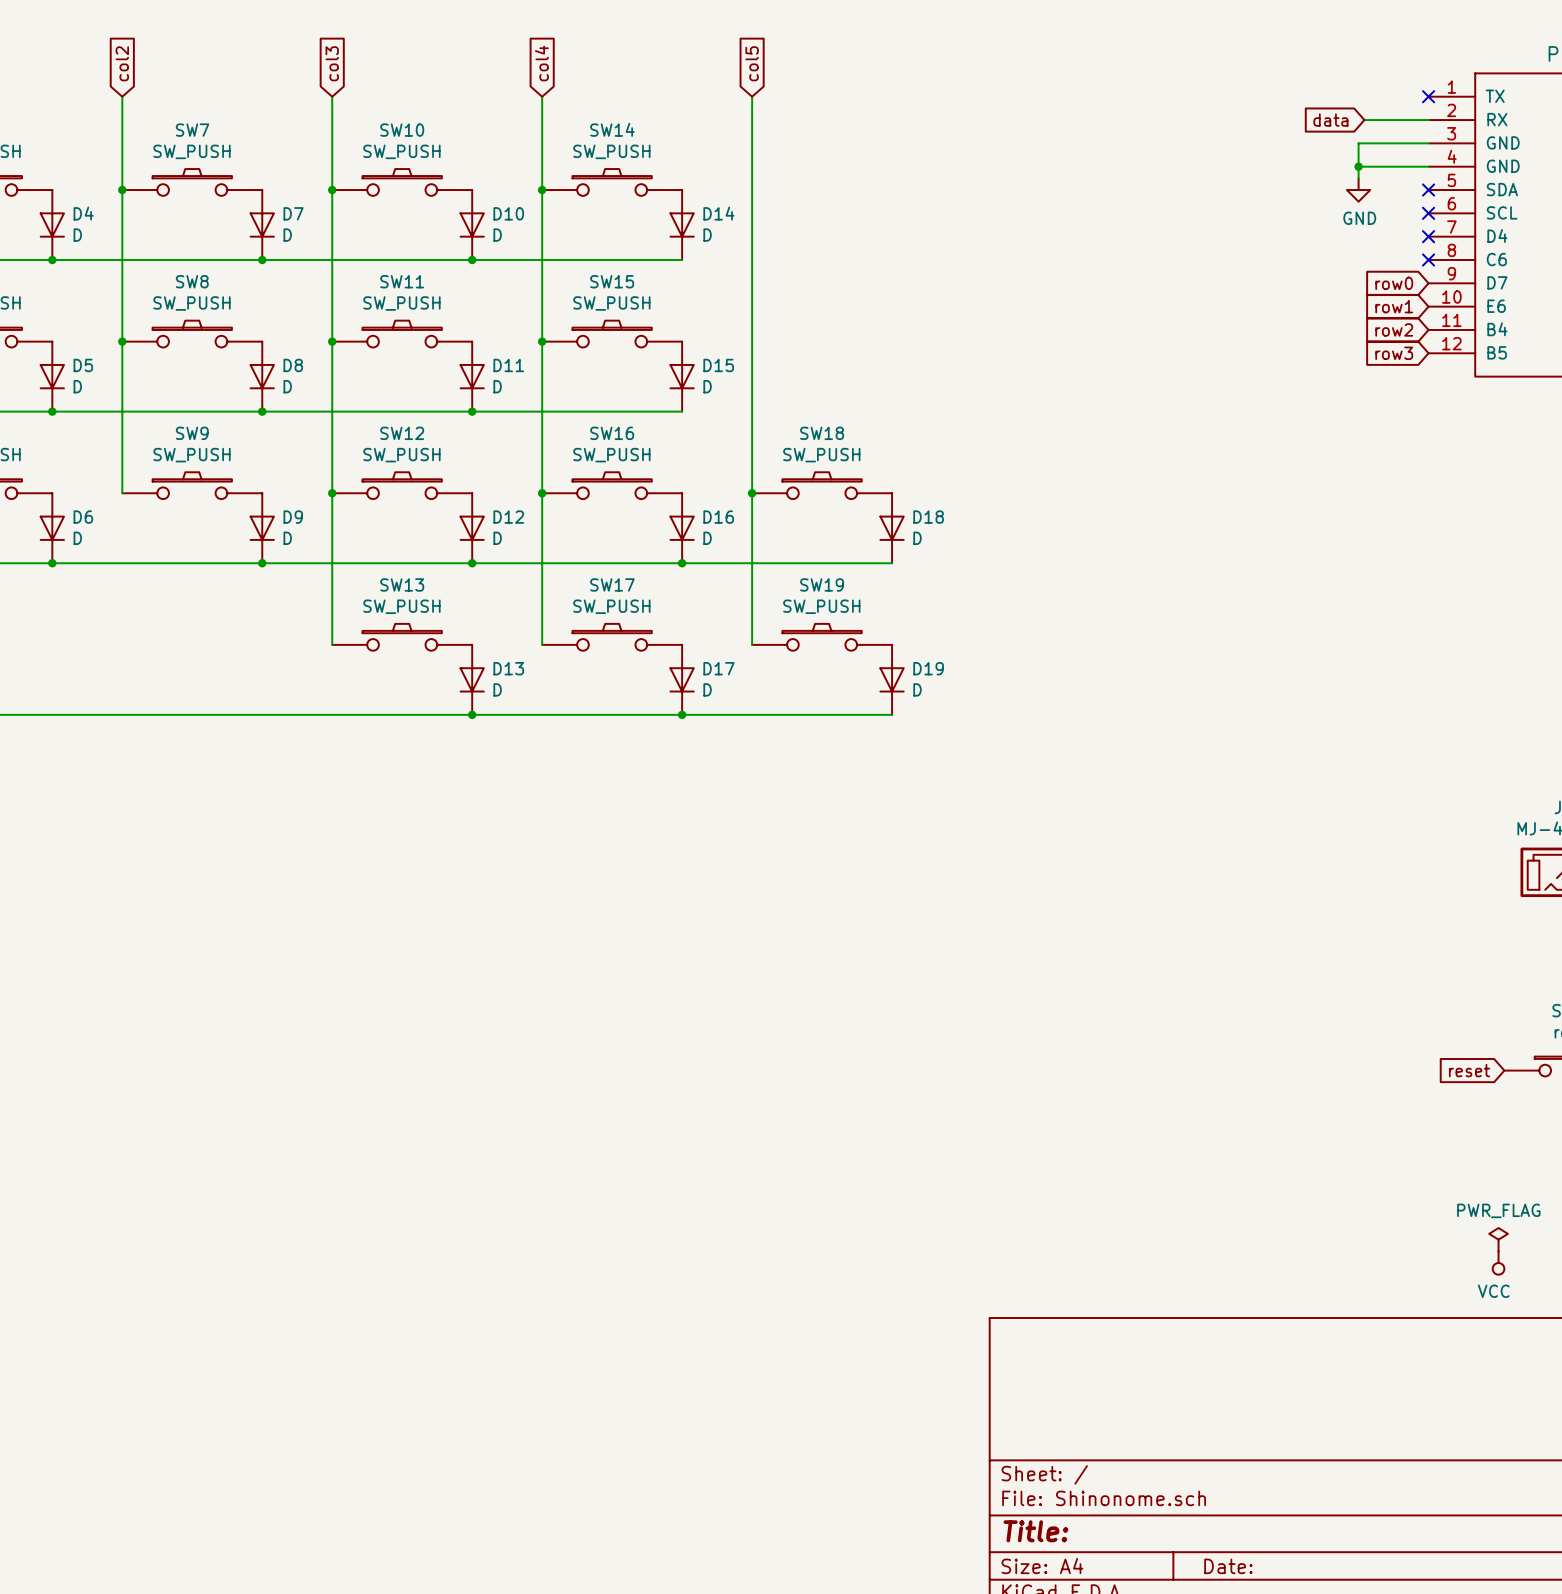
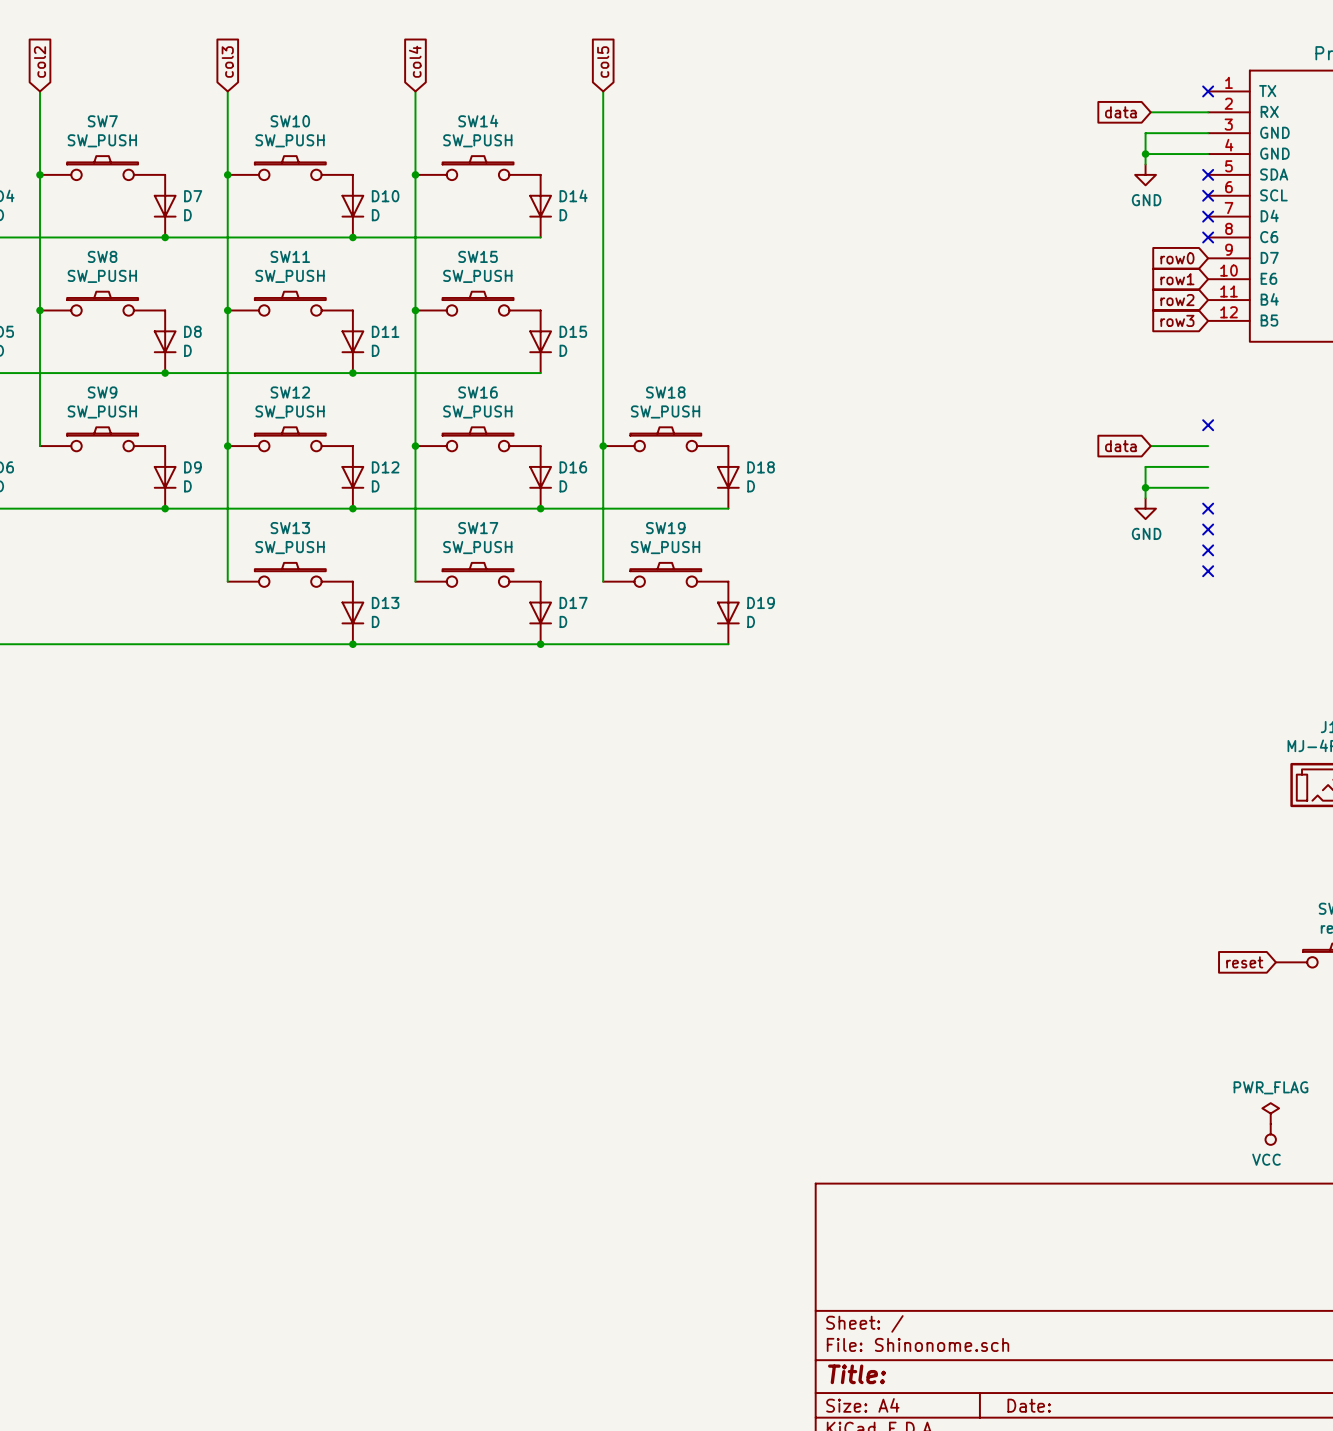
no-connect mark: none -> (1208, 425)
global label: none -> data (1120, 446)
wire: none -> (1150, 446) (1208, 446)
wire: none -> (1208, 466) (1145, 466) (1145, 498)
wire: none -> (1145, 487) (1208, 487)
junction: none -> (1145, 487)
power symbol: none -> GND (1145, 508)
no-connect mark: none -> (1208, 508)
no-connect mark: none -> (1208, 529)
no-connect mark: none -> (1208, 550)
no-connect mark: none -> (1208, 571)

